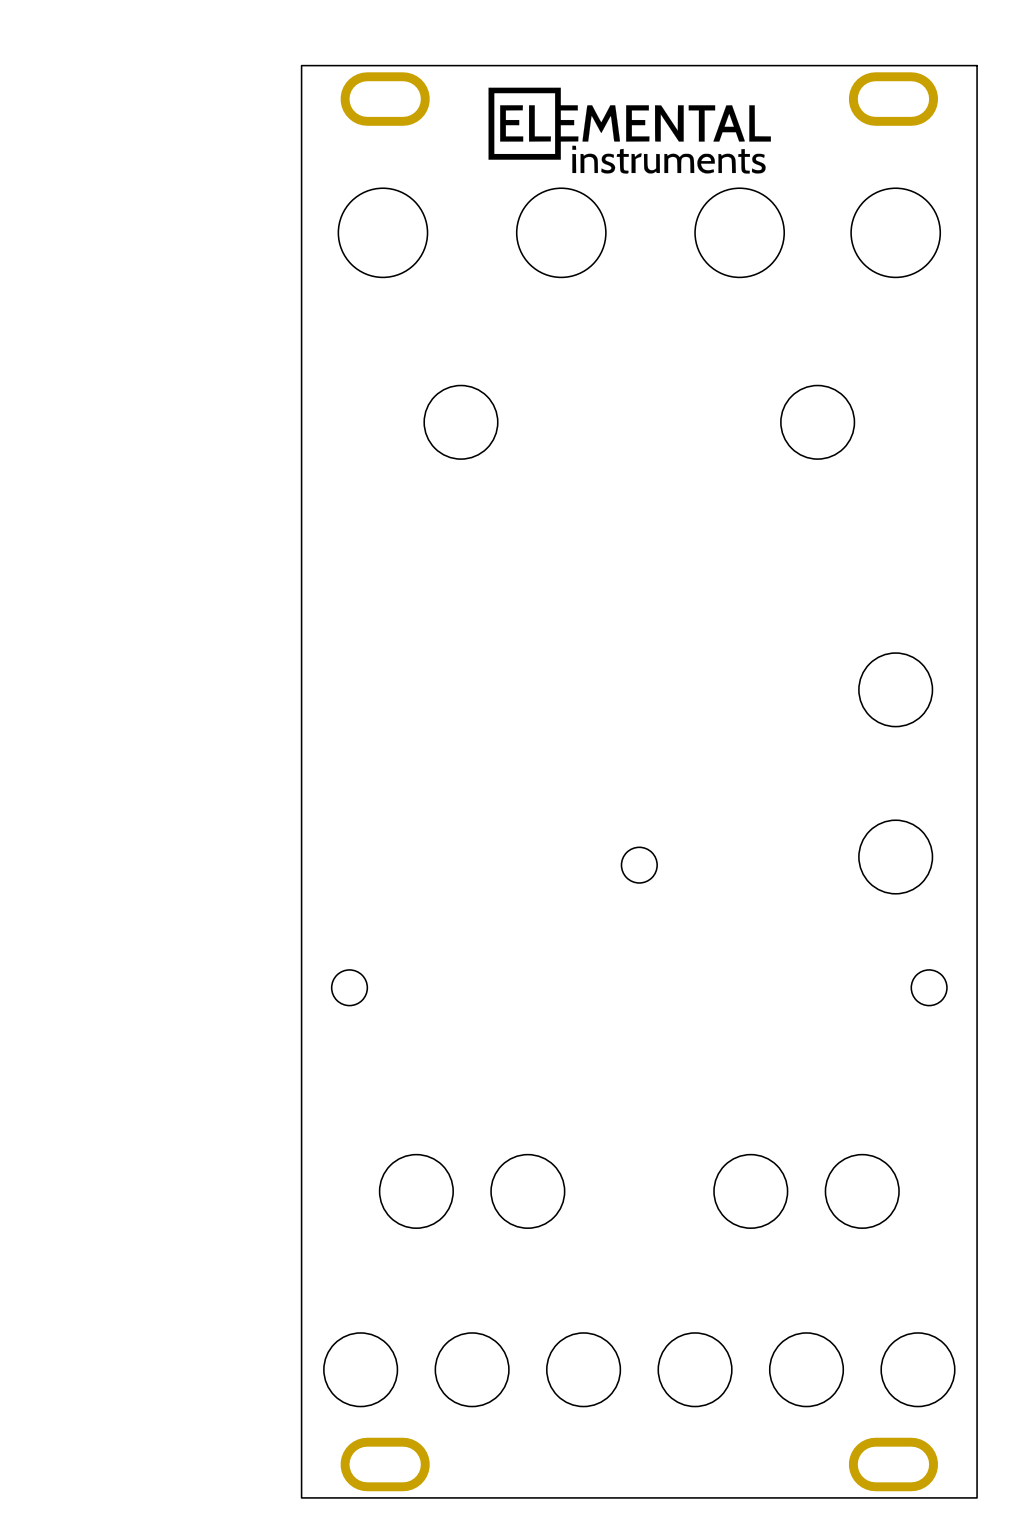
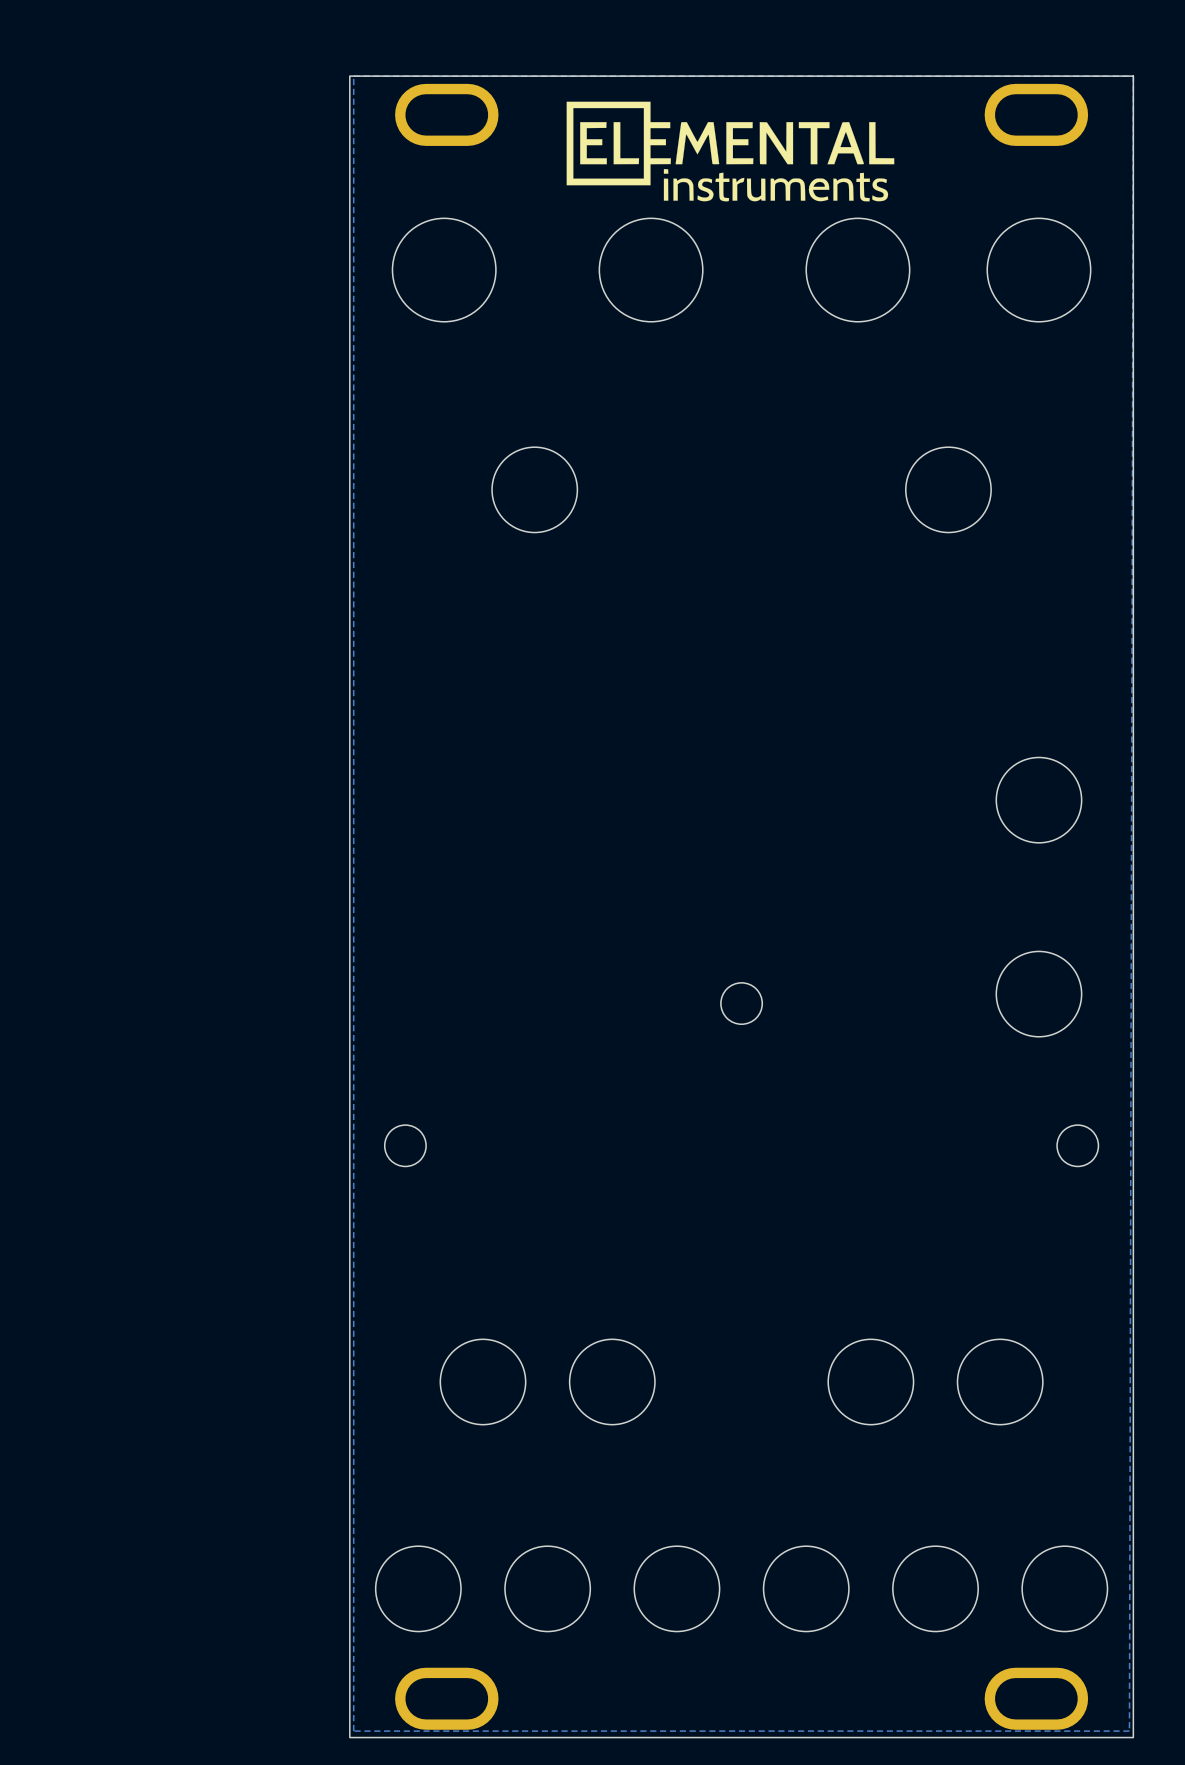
zone outline: none -> (1133, 76) (1129, 1731) (353, 1731) (353, 76) (1133, 76)

